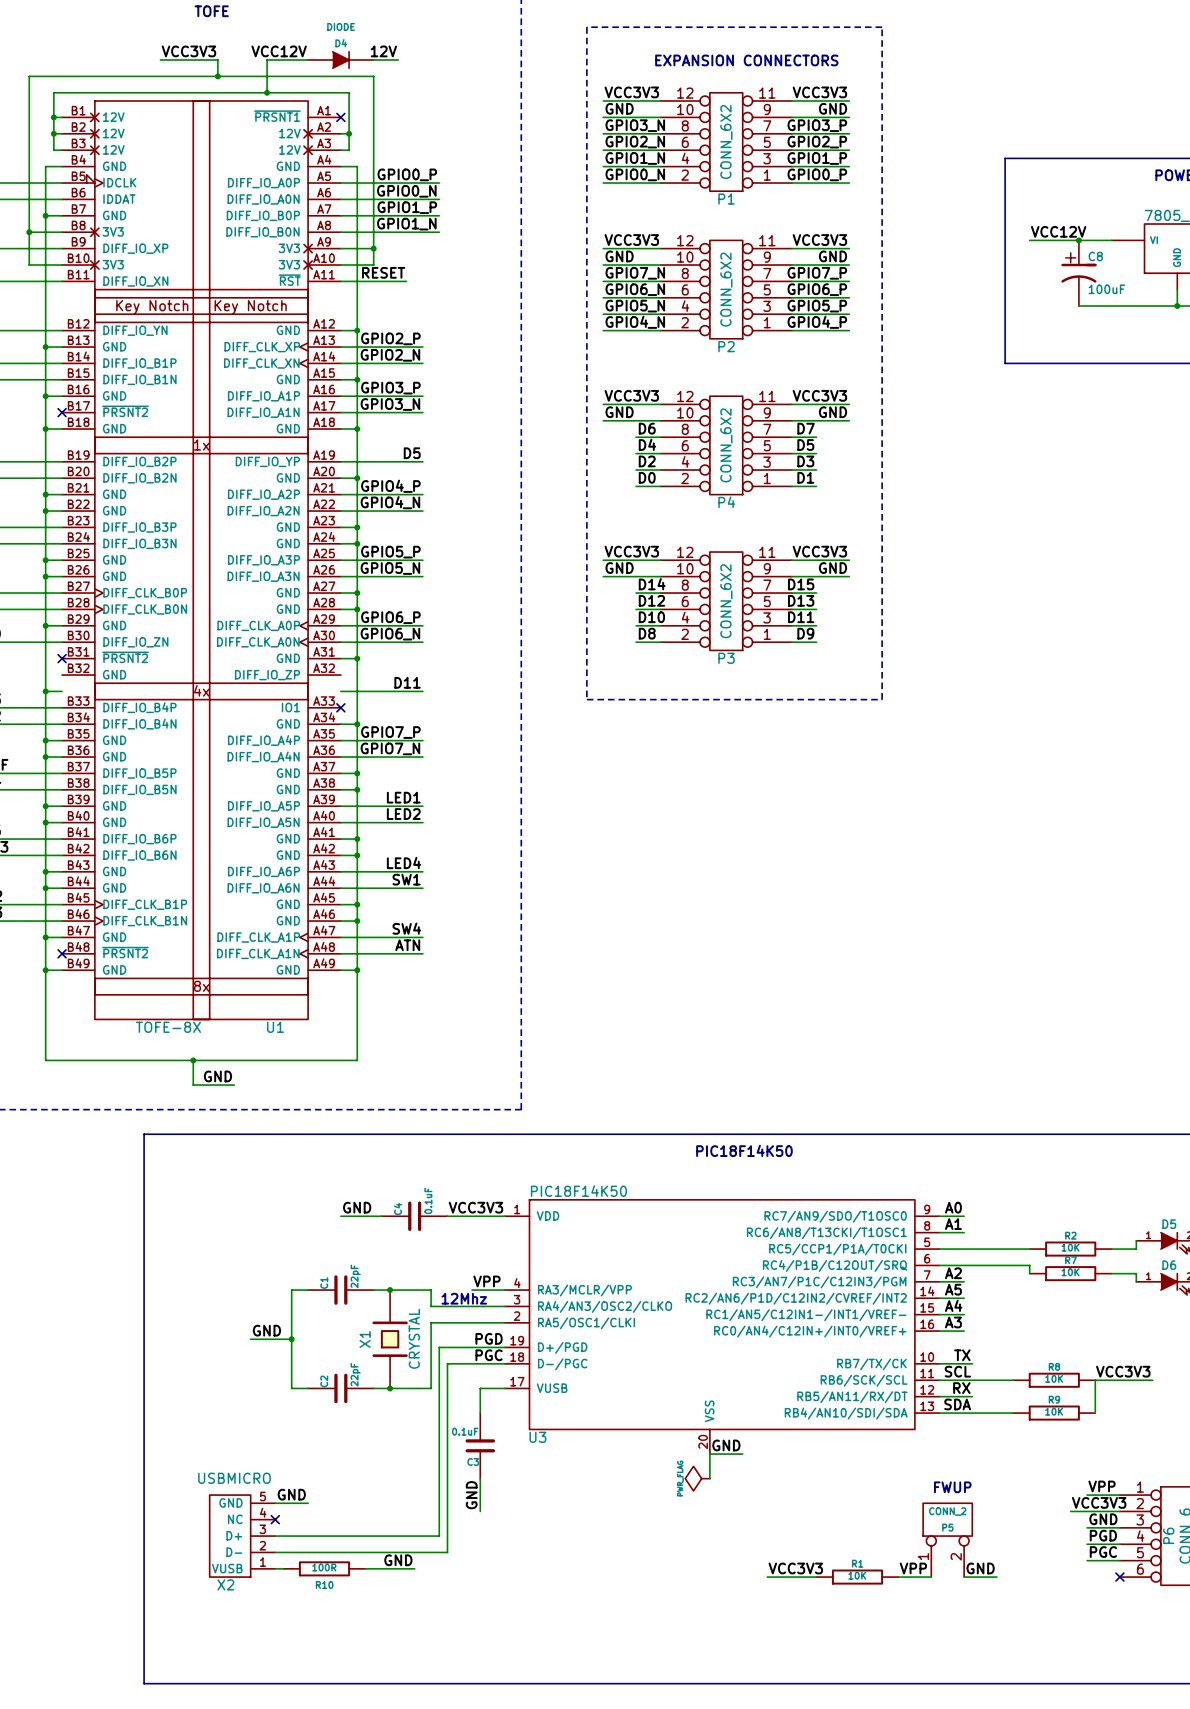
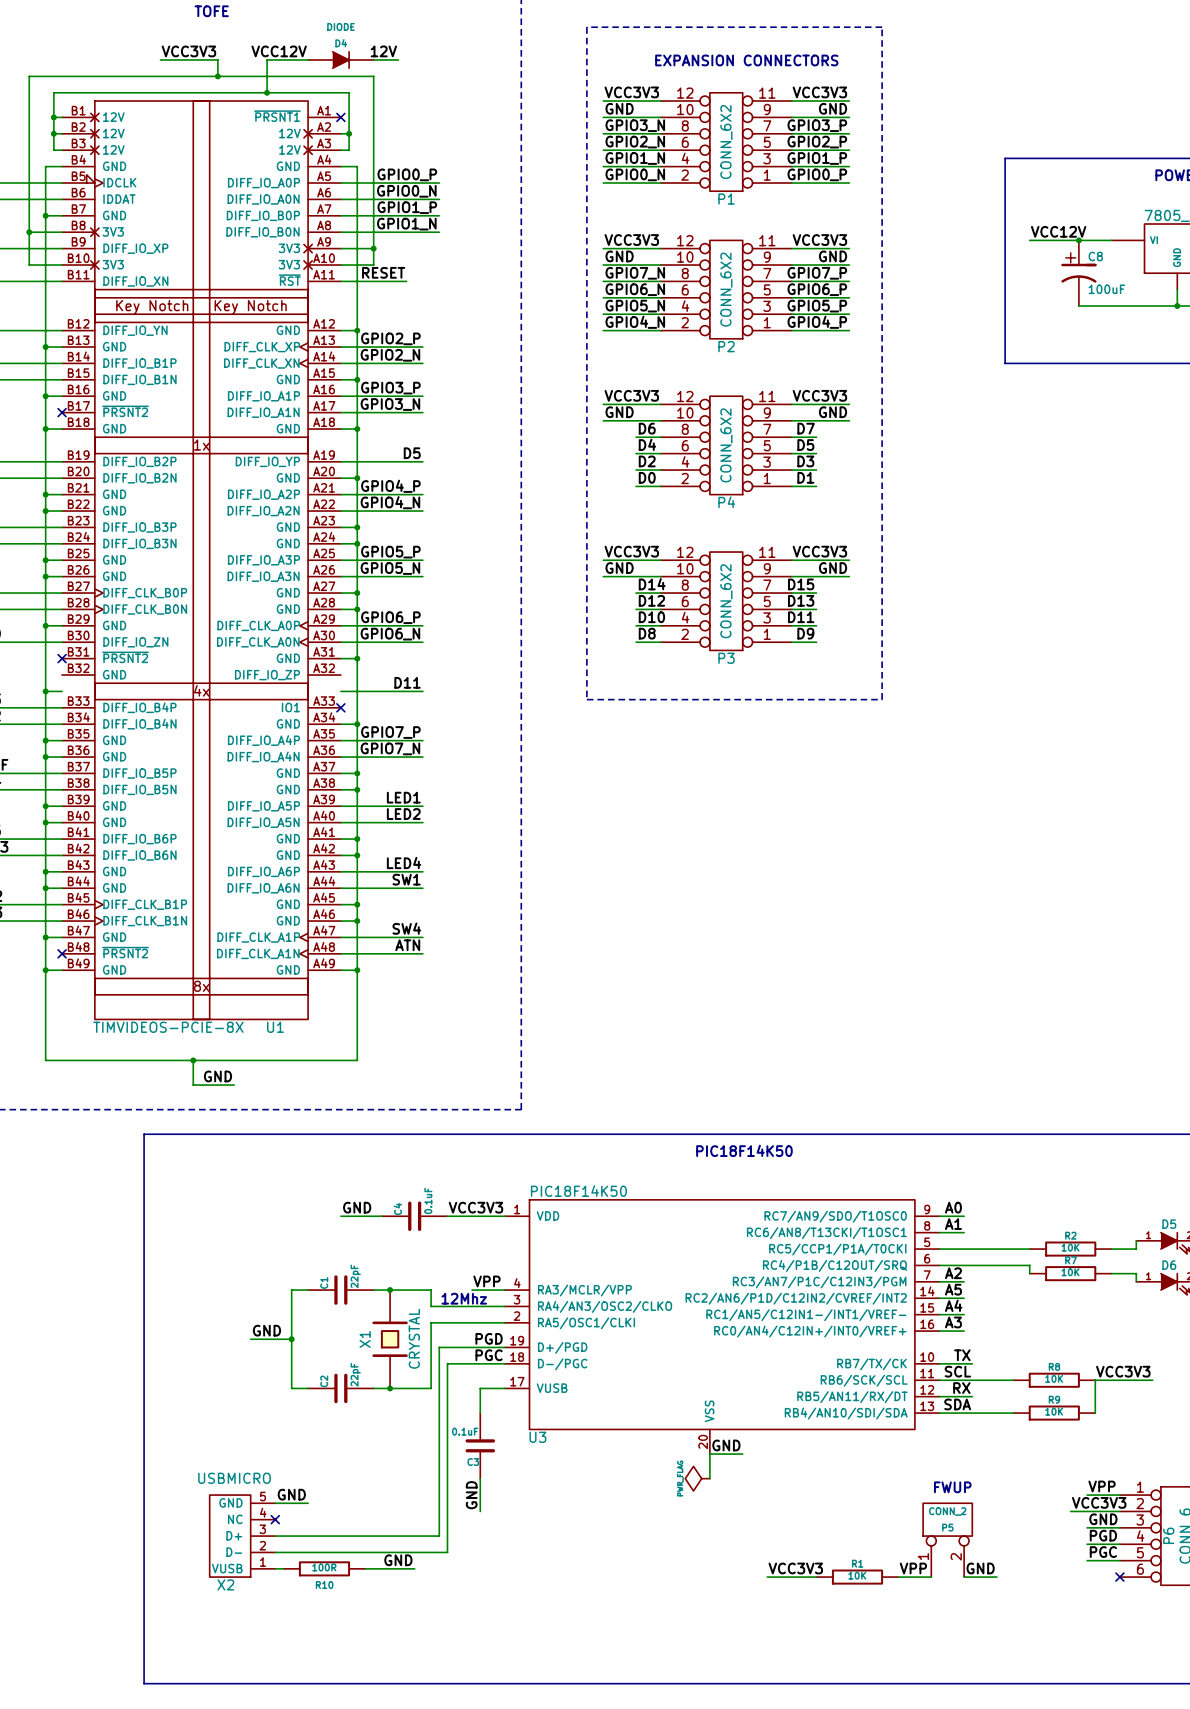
U1 value: TOFE-8X (168, 1027) -> TIMVIDEOS-PCIE-8X (168, 1027)

